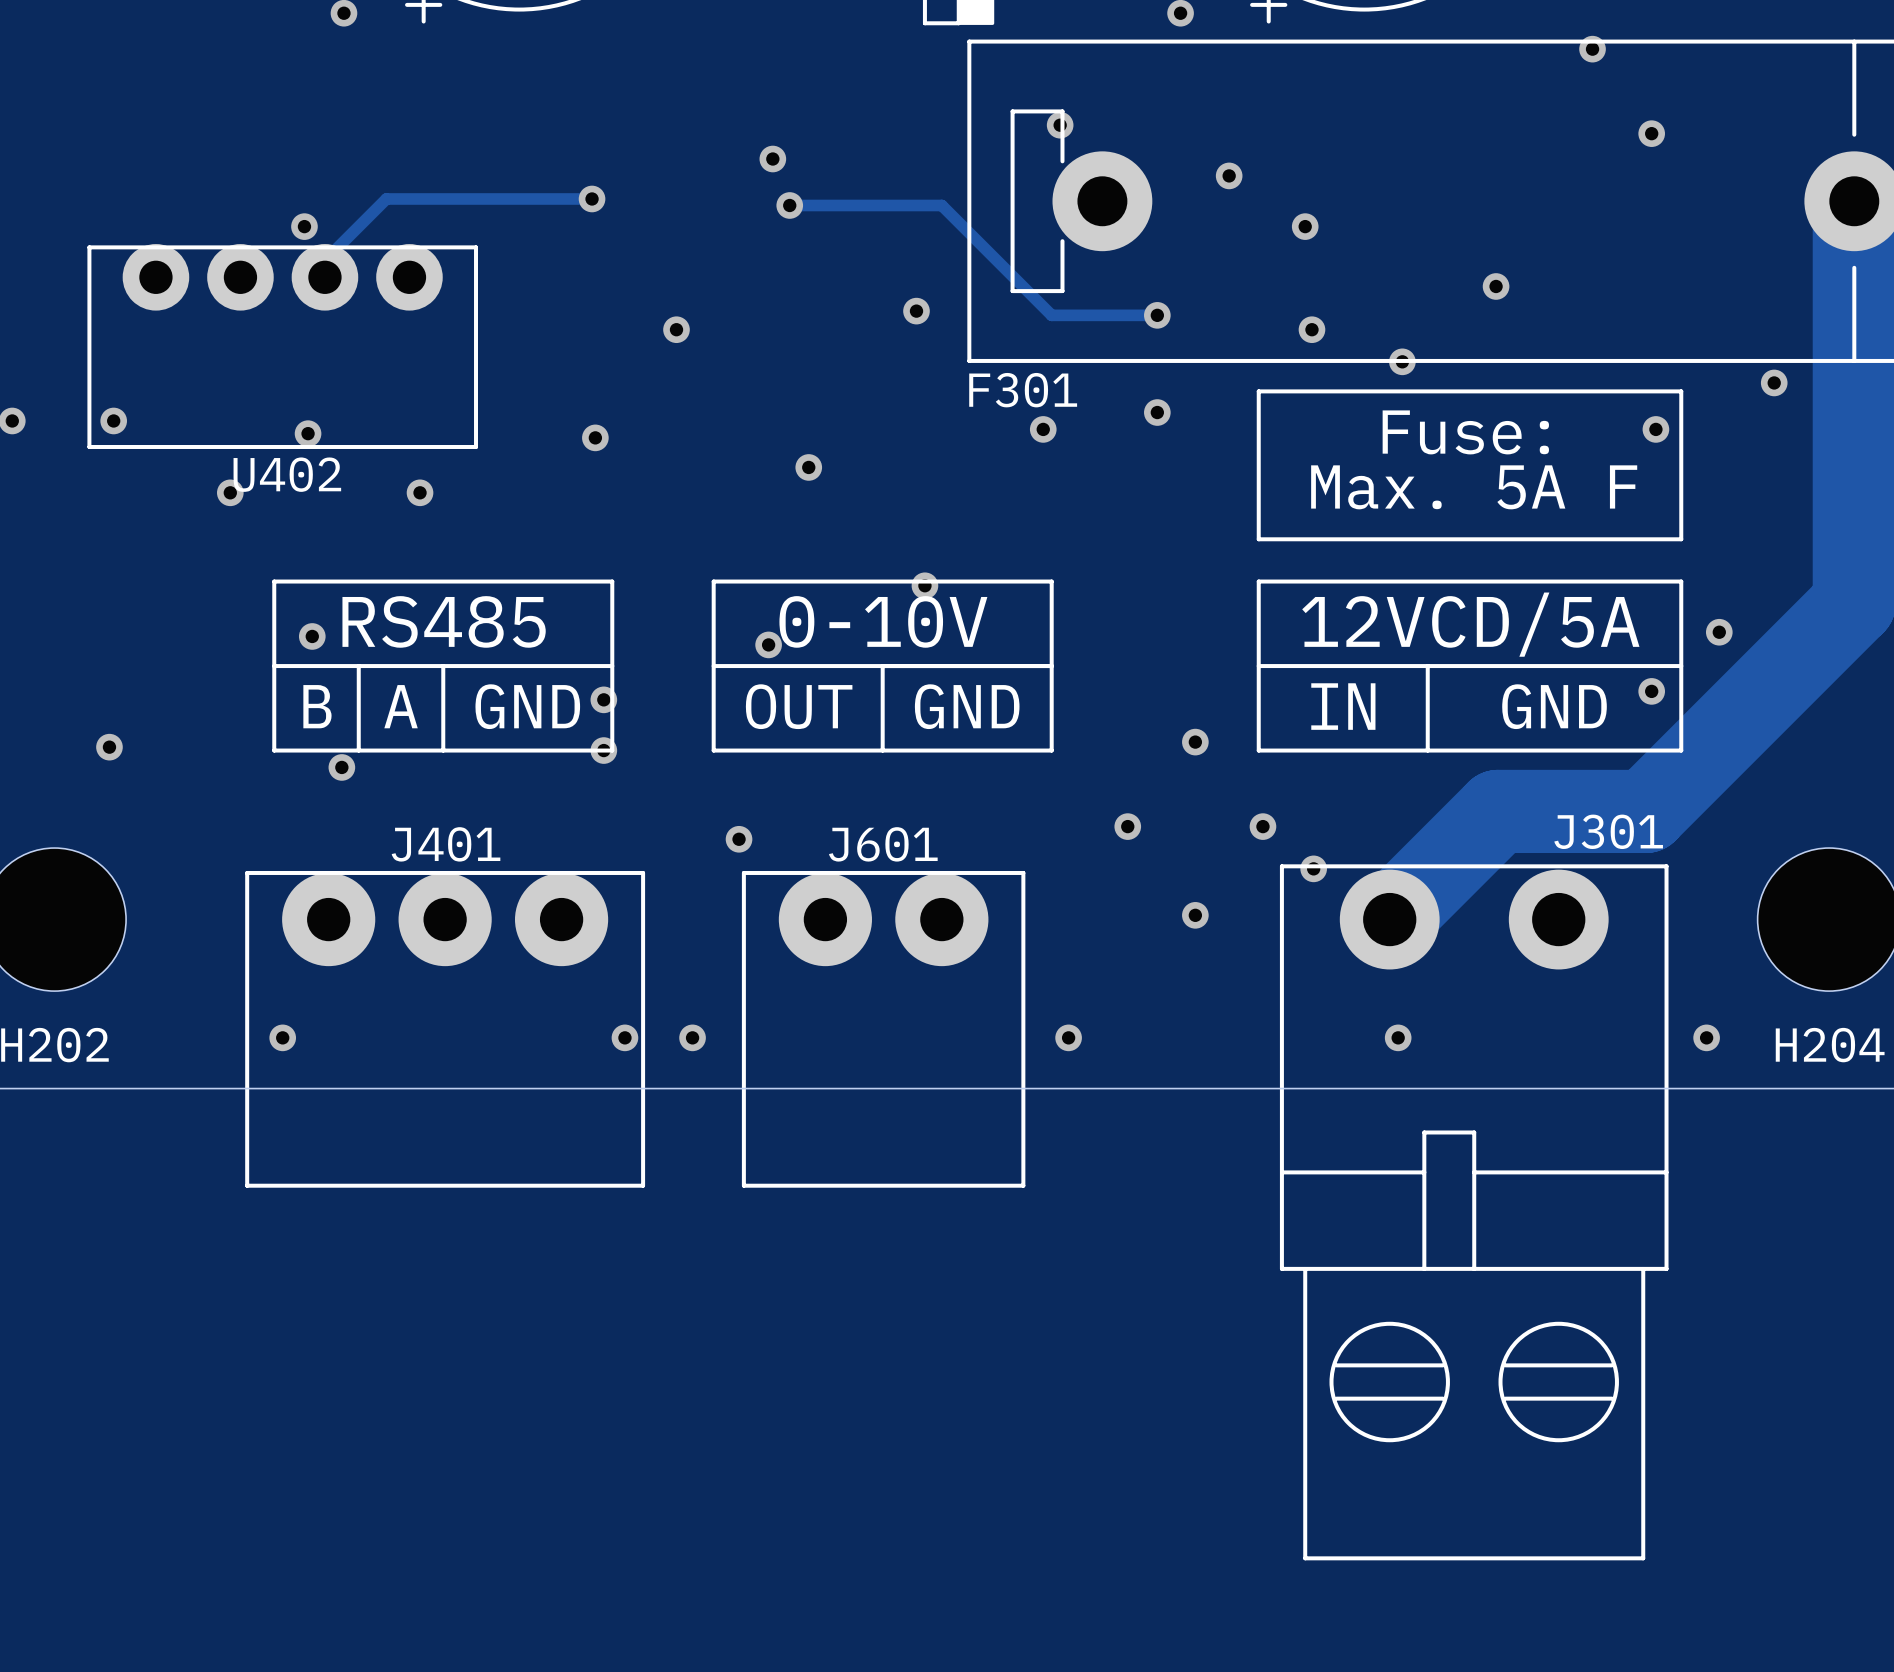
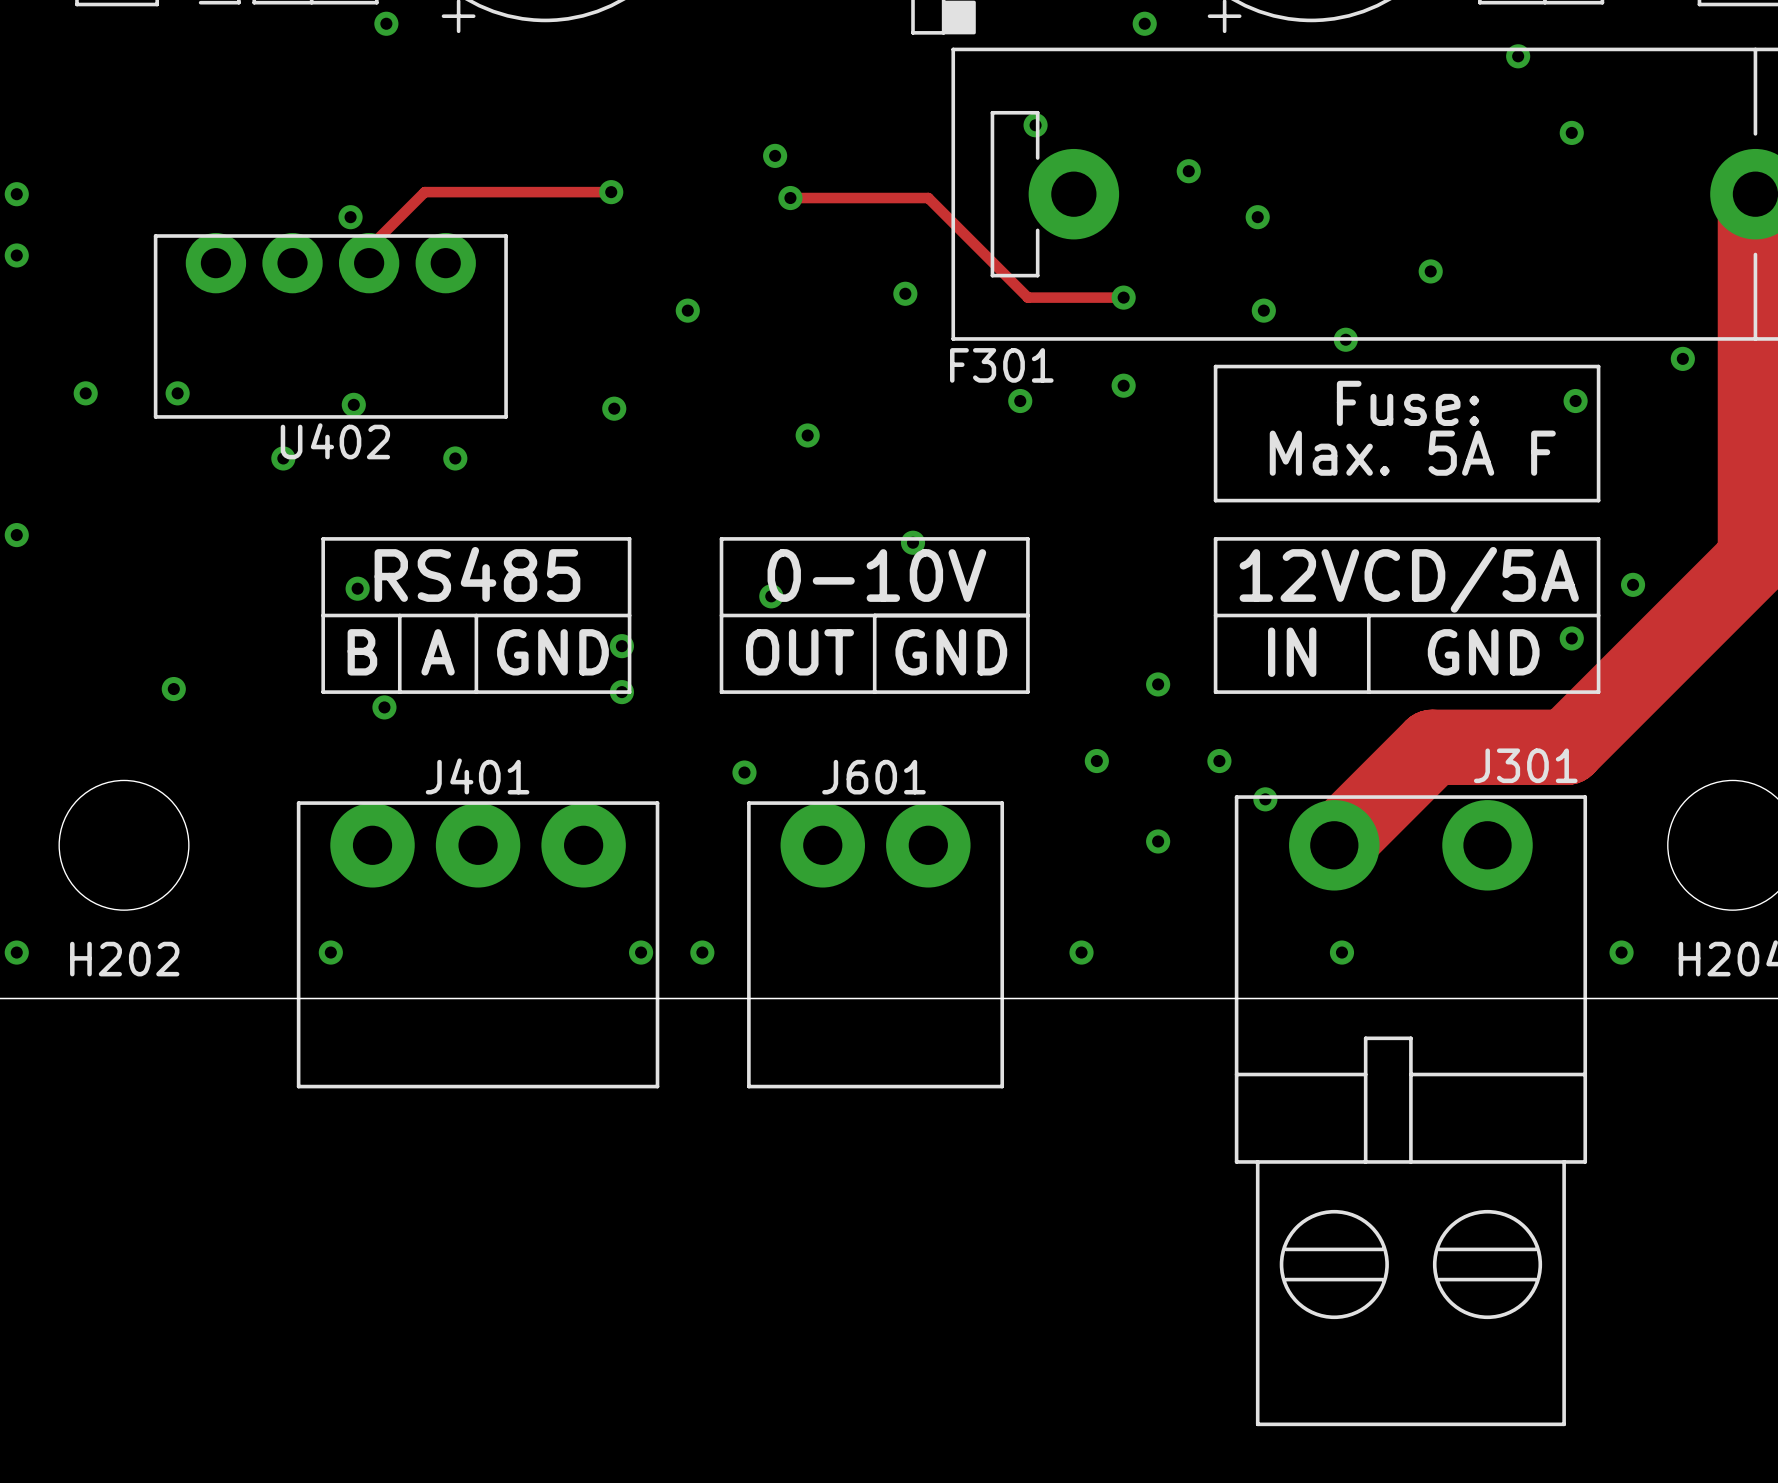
via position: (1068, 1037) -> (1081, 952)

